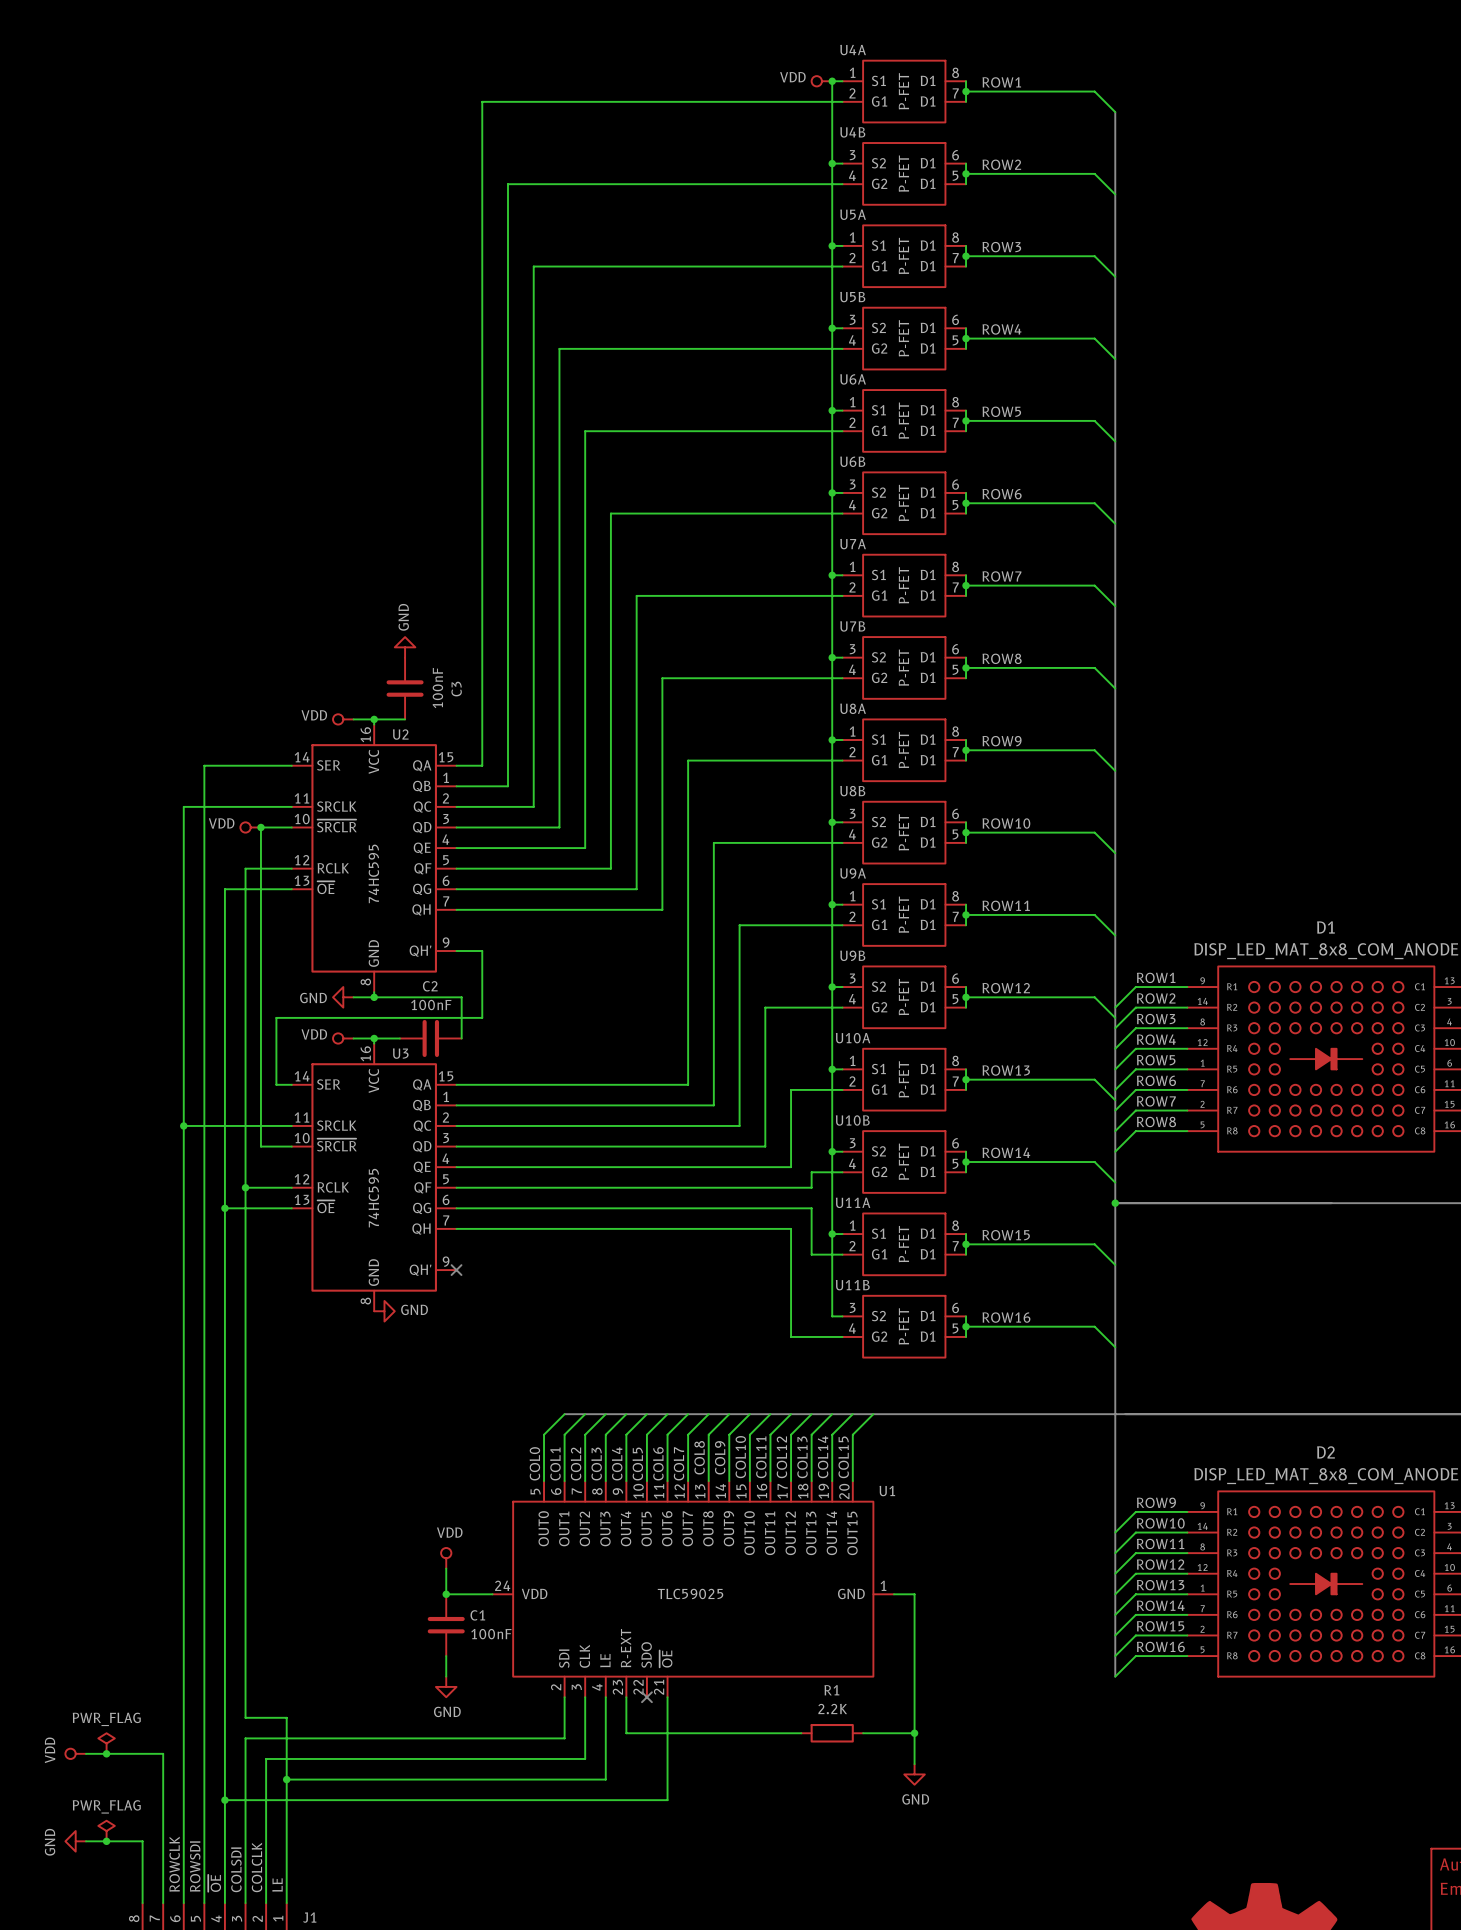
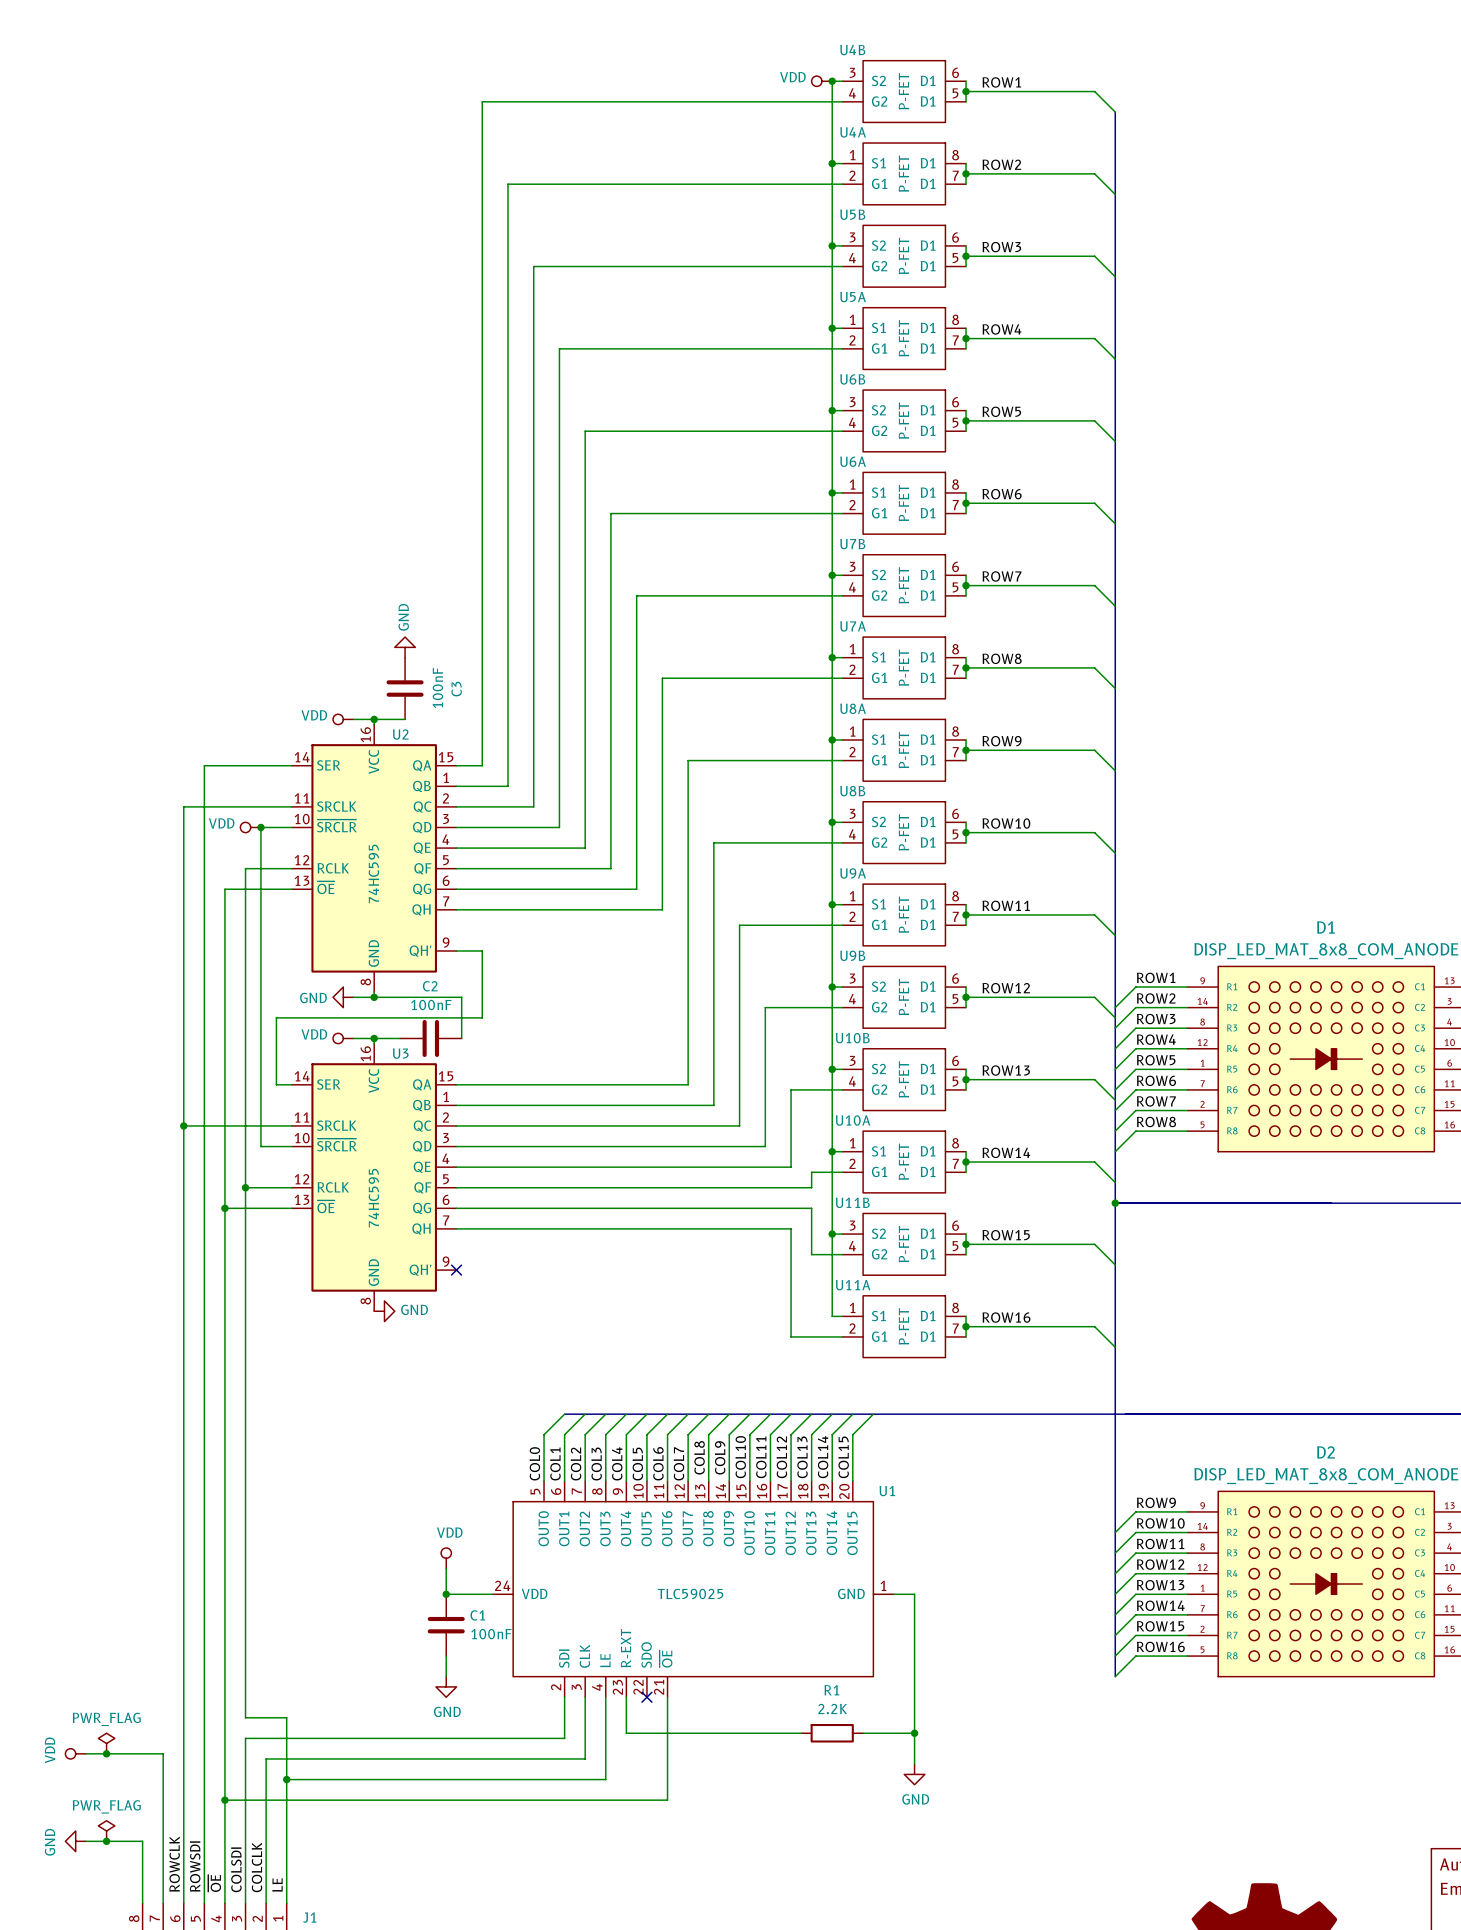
U4A position: (904, 91) -> (904, 173)
U4B position: (904, 173) -> (904, 91)
U5A position: (904, 256) -> (904, 338)
U5B position: (904, 338) -> (904, 256)
U6A position: (904, 420) -> (904, 503)
U6B position: (904, 503) -> (904, 420)
U7A position: (904, 585) -> (904, 667)
U7B position: (904, 667) -> (904, 585)
U10A position: (904, 1079) -> (904, 1162)
U10B position: (904, 1162) -> (904, 1079)
U11A position: (904, 1244) -> (904, 1326)
U11B position: (904, 1326) -> (904, 1244)

